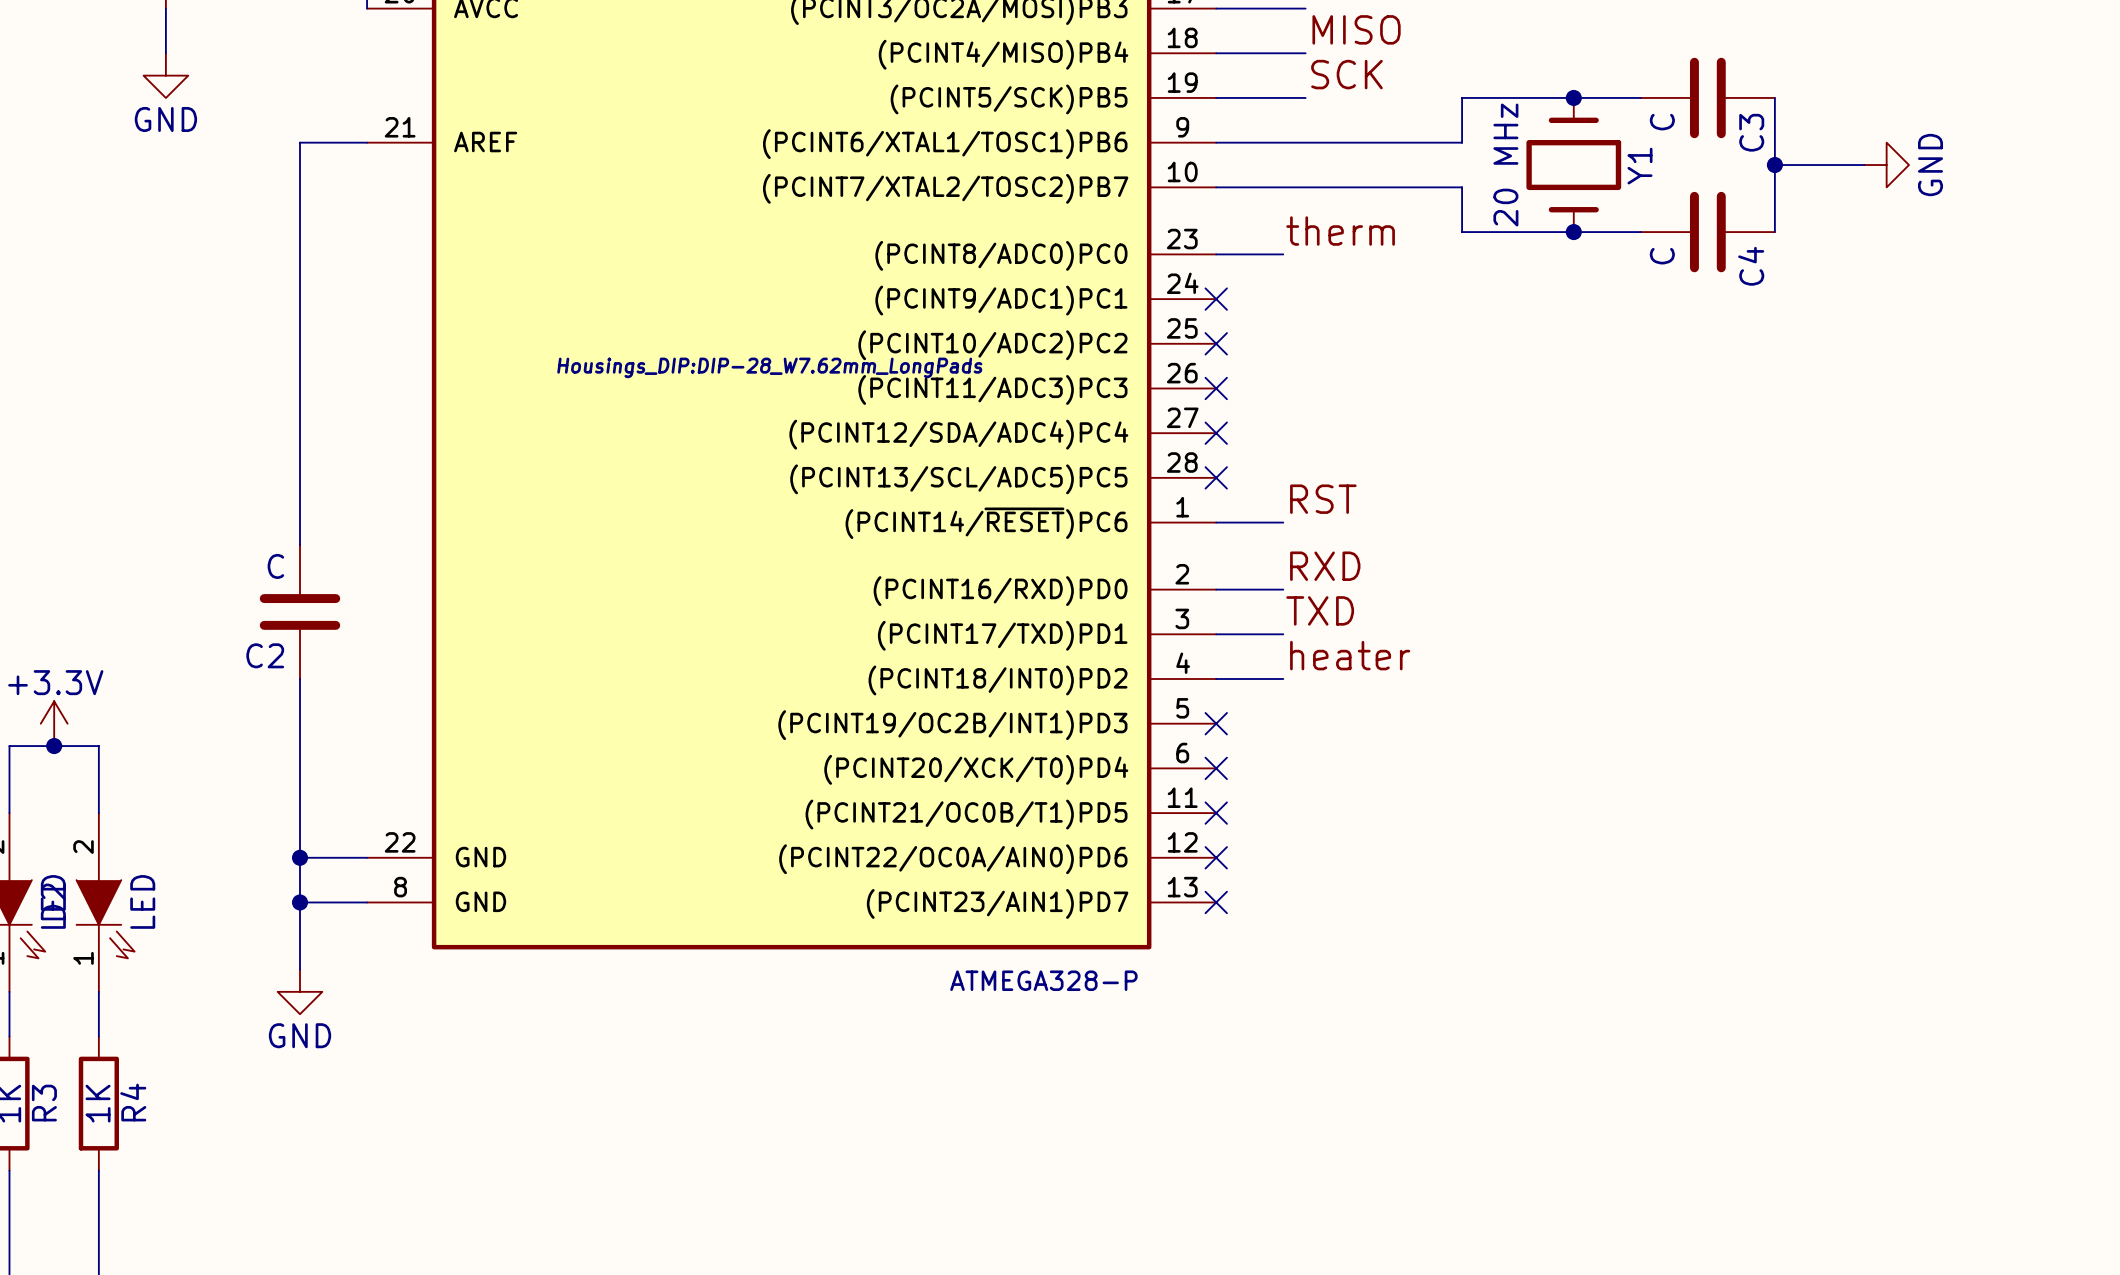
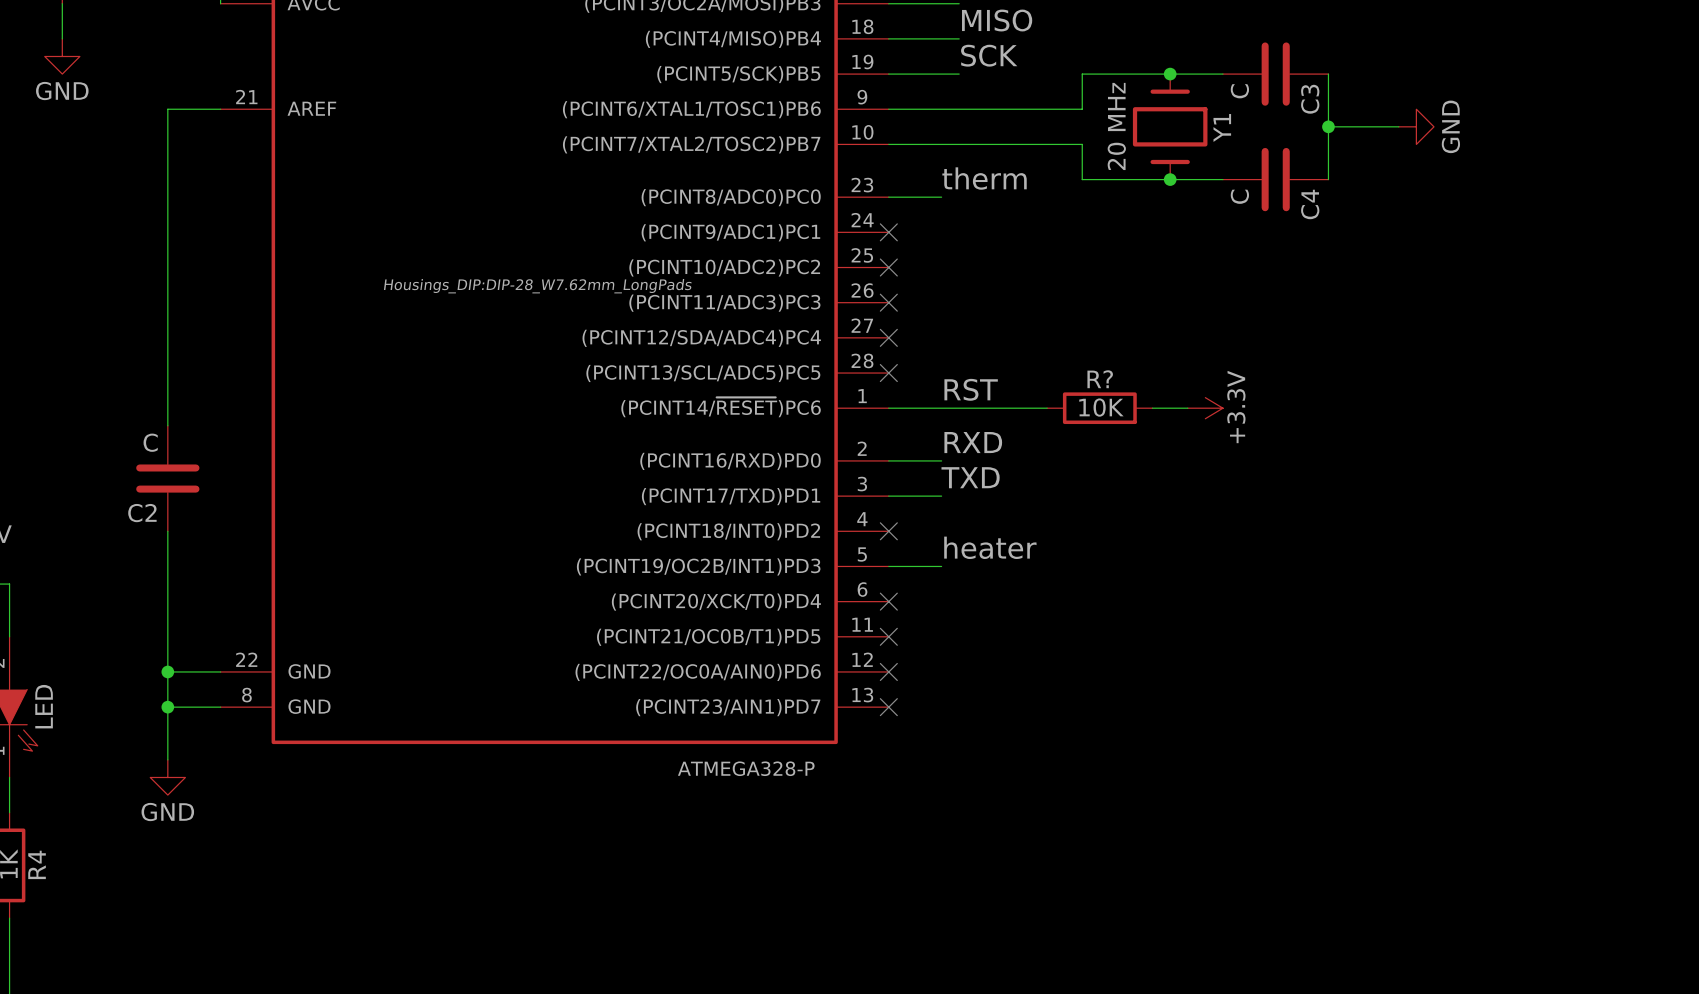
wire: none -> (941, 408) (1047, 408)
R?: none -> 10K (1099, 408)
wire: none -> (1152, 408) (1187, 408)
power symbol: none -> +3.3V (1205, 408)
label position: heater (1350, 655) -> heater (990, 547)
wire: (1216, 679) (1283, 679) -> (888, 566) (941, 566)
no-connect mark position: (1216, 723) -> (888, 531)

